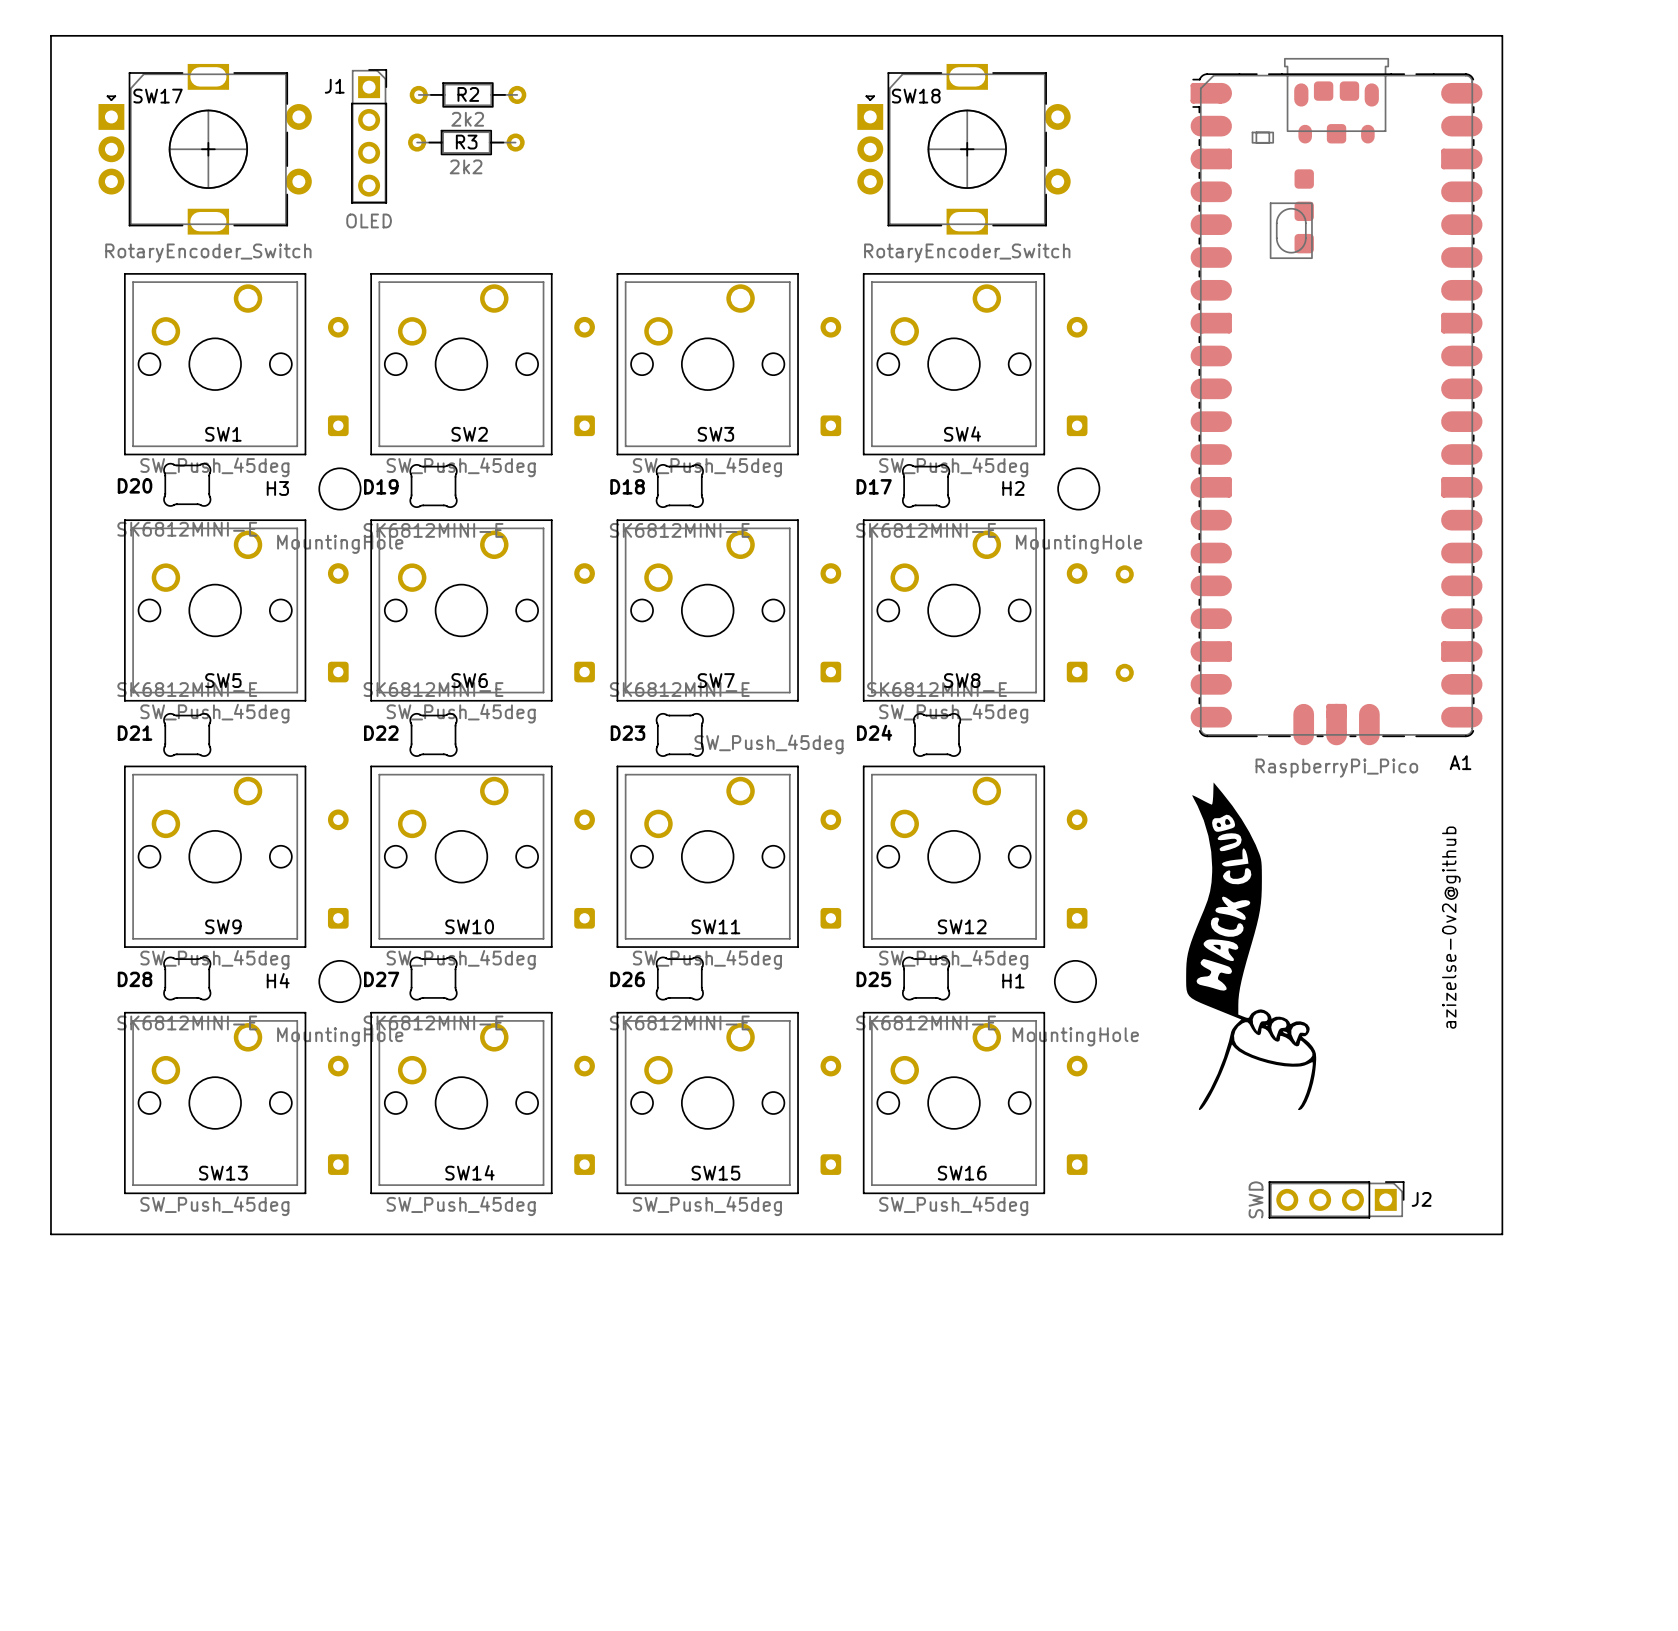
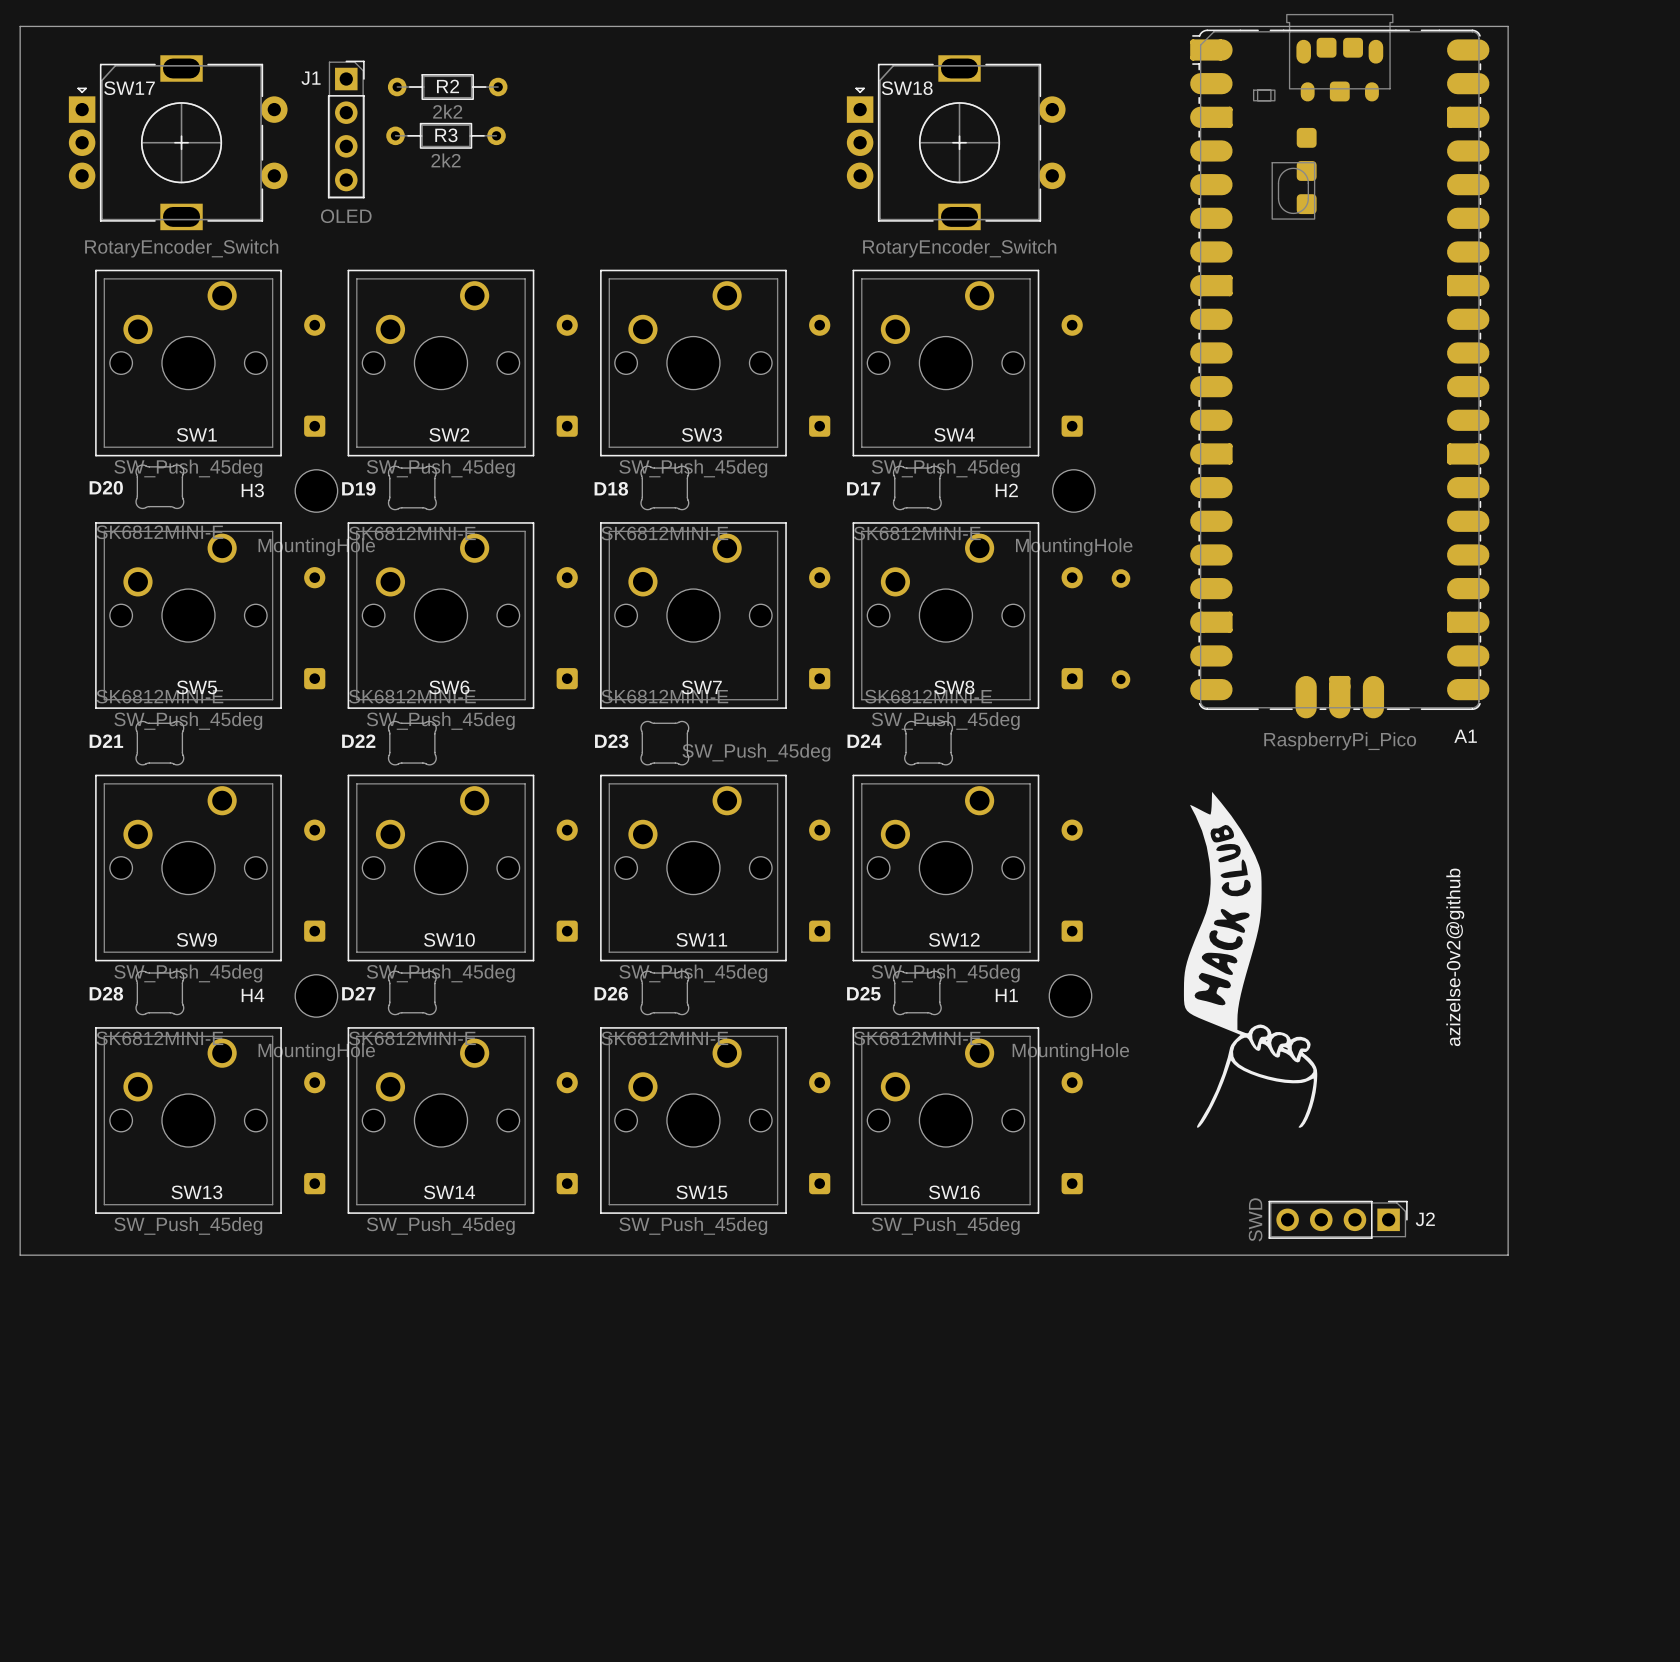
A1 position: (1336, 401) -> (1339, 366)

